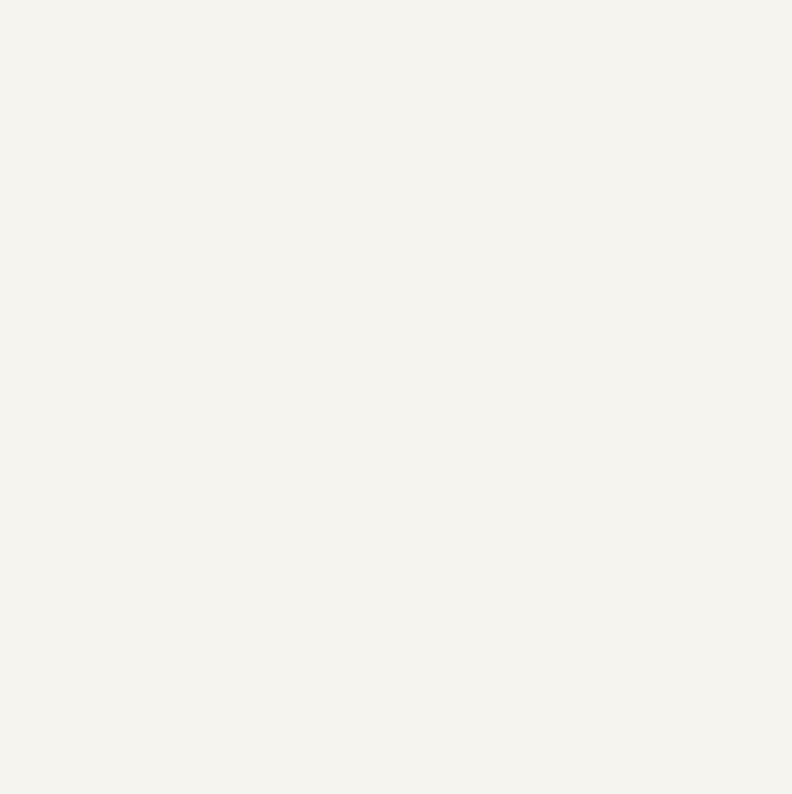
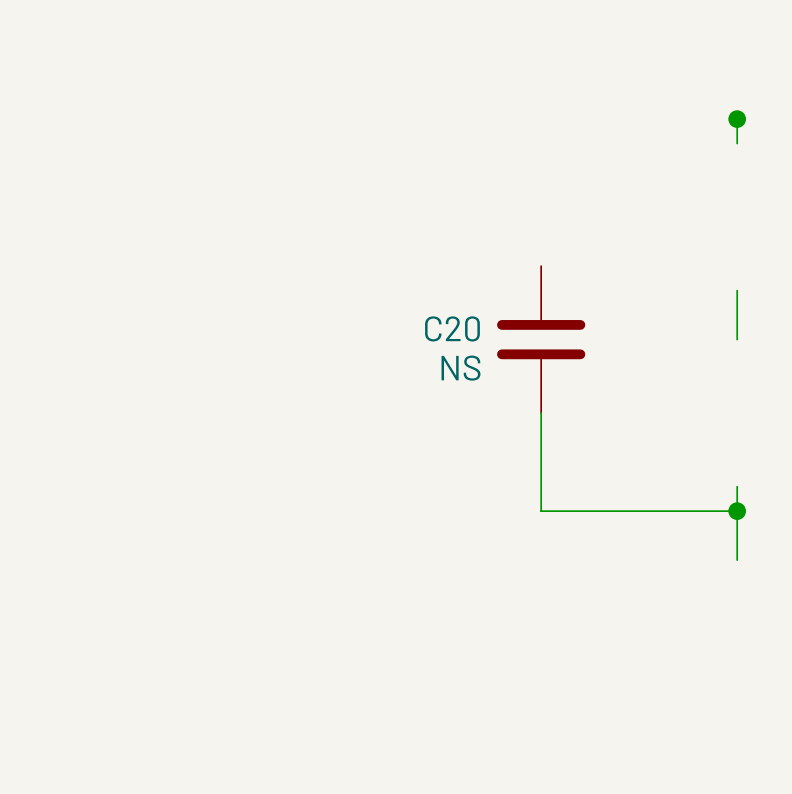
wire: none -> (737, 119) (737, 143)
junction: none -> (737, 119)
wire: none -> (737, 290) (737, 339)
C20: none -> NS (541, 339)
wire: none -> (541, 413) (541, 511) (737, 511)
wire: none -> (737, 486) (737, 560)
junction: none -> (737, 511)

